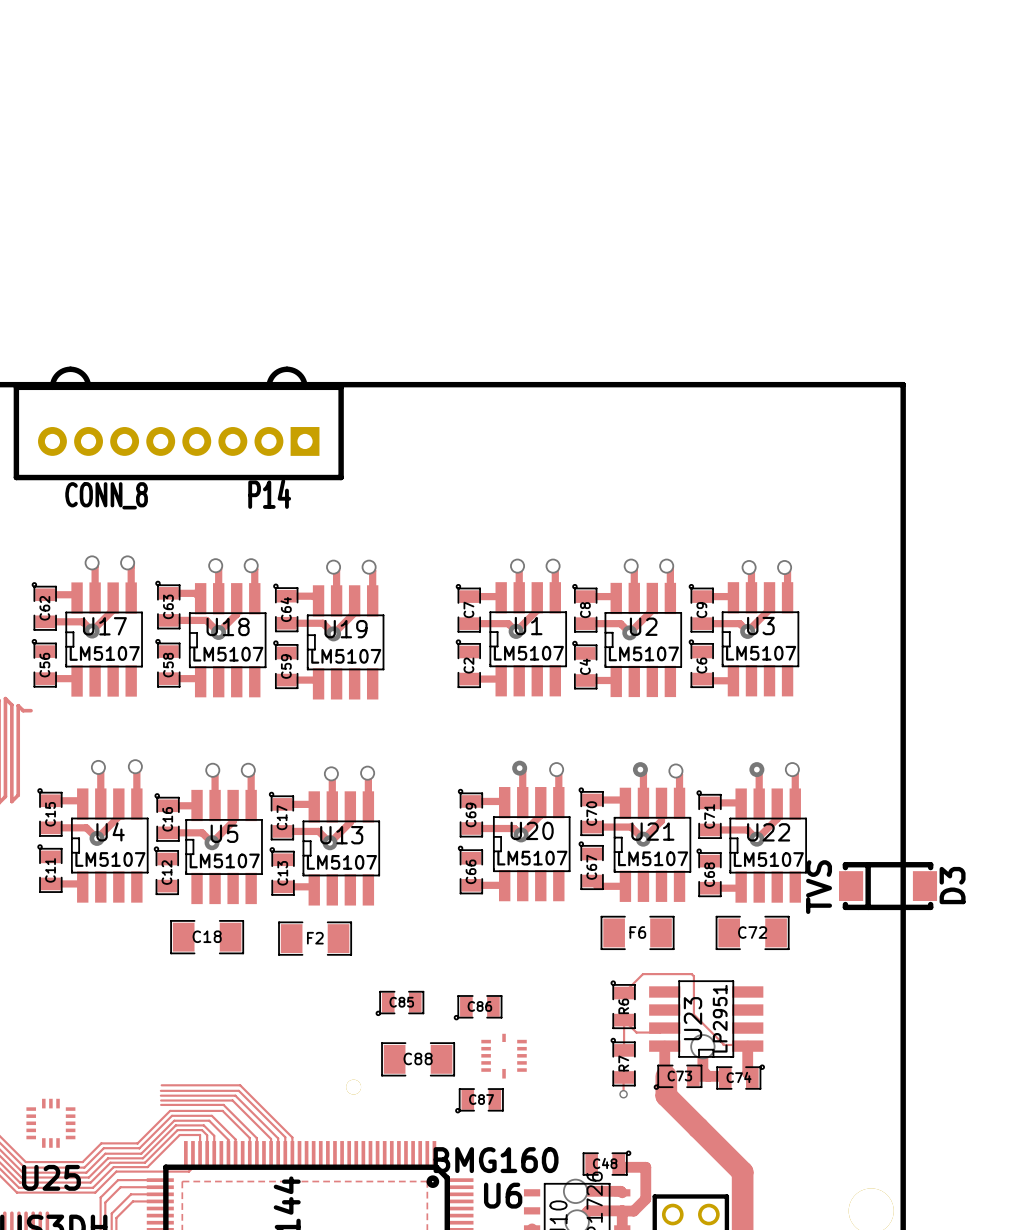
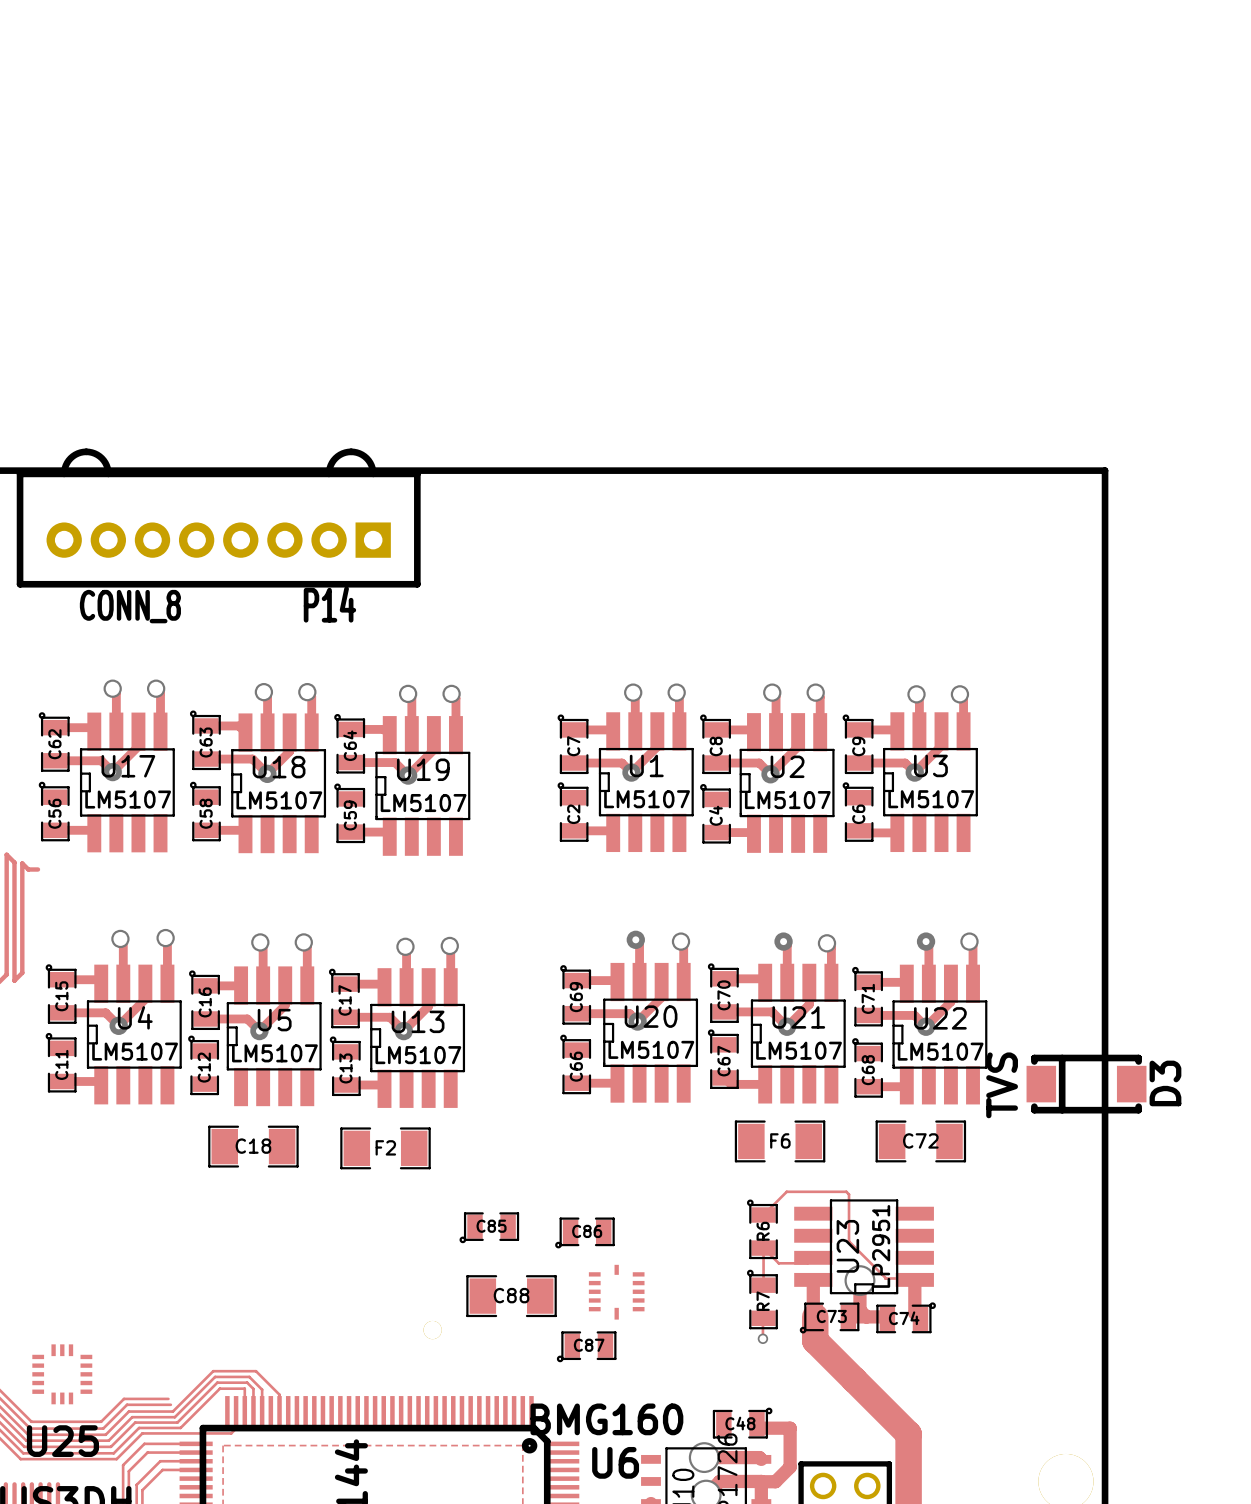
track: (161, 1085) (240, 1085) (292, 1137) (292, 1154) -> none
track: (160, 1090) (238, 1090) (285, 1137) (285, 1154) -> none
track: (160, 1095) (235, 1095) (278, 1138) (278, 1154) -> none
track: (161, 1100) (232, 1100) (271, 1138) (271, 1154) -> none
track: (161, 1104) (223, 1104) (256, 1138) (256, 1154) -> none
track: (137, 1143) (170, 1110) (222, 1110) (249, 1138) (249, 1154) -> none
track: (139, 1148) (172, 1115) (211, 1115) (235, 1139) (235, 1154) -> none

